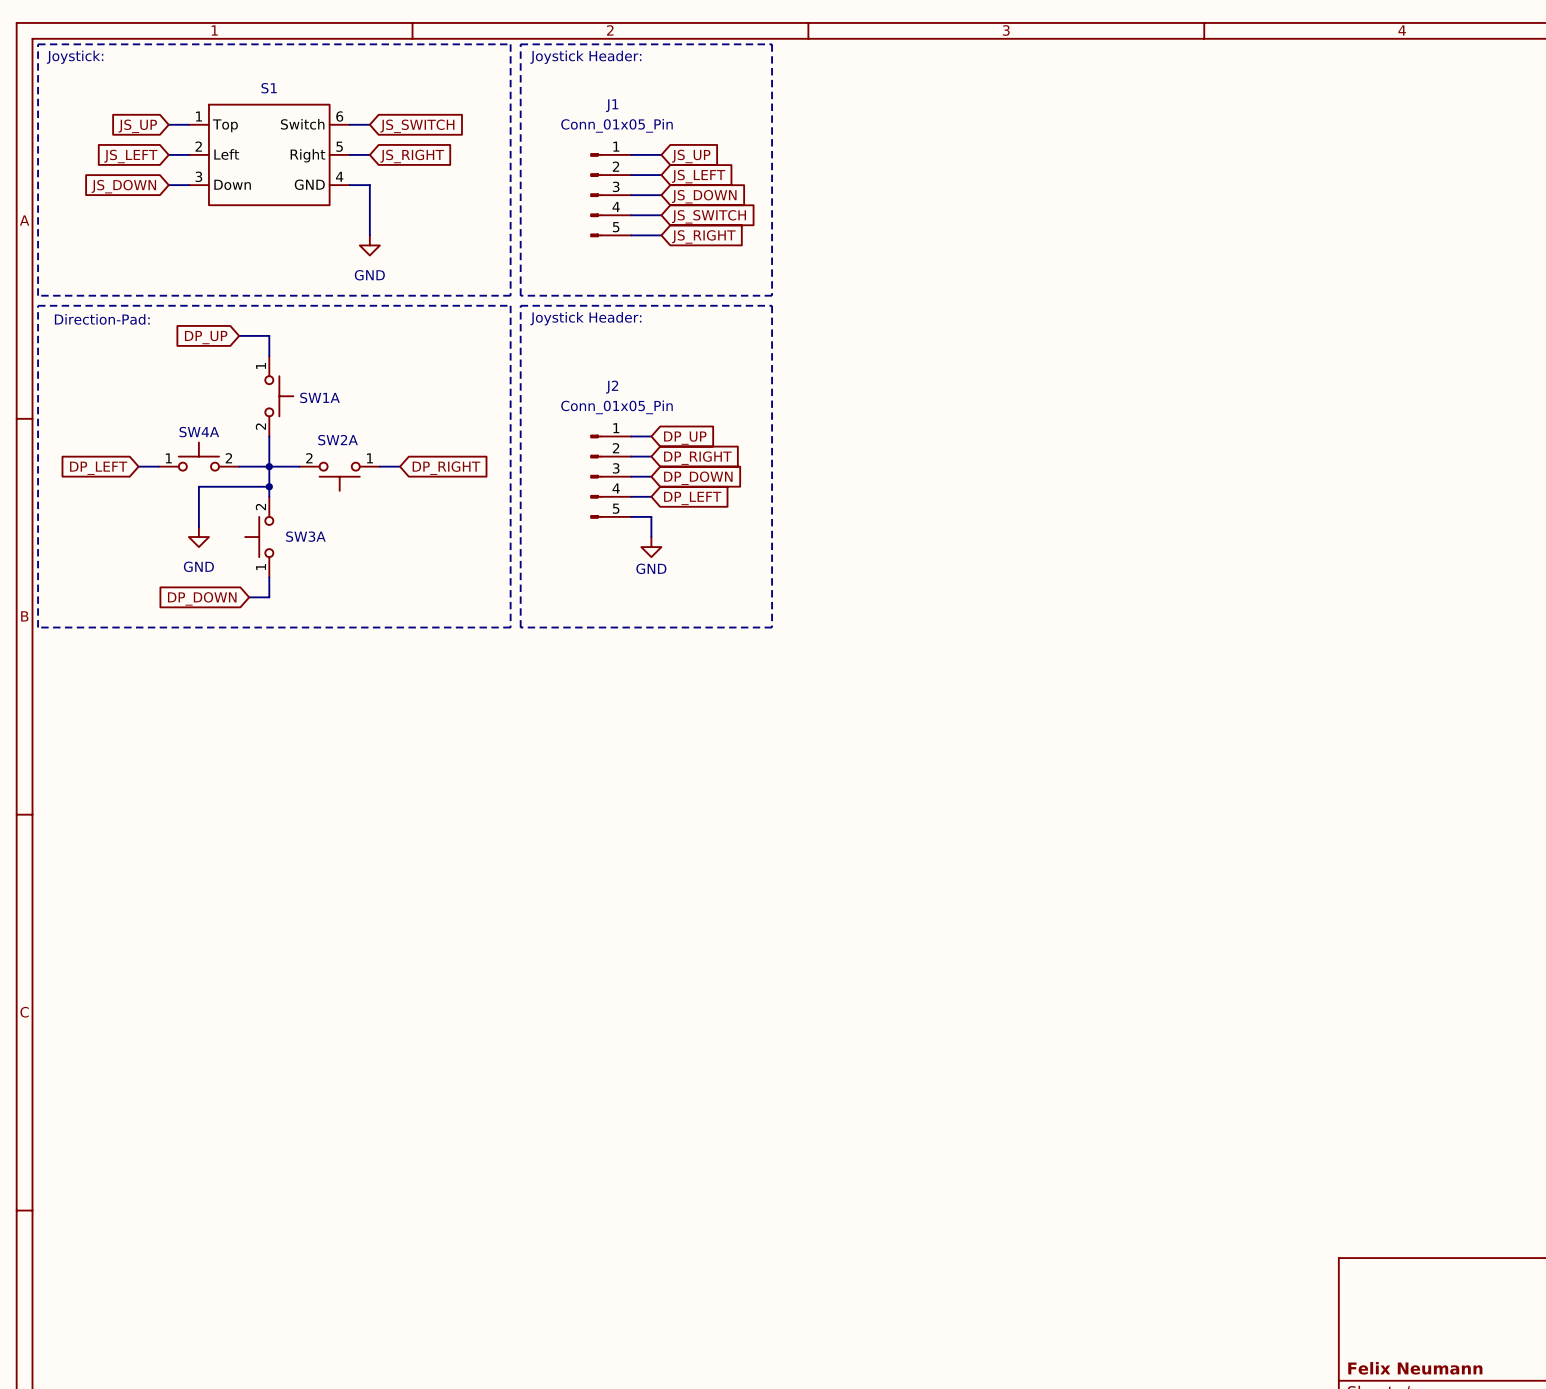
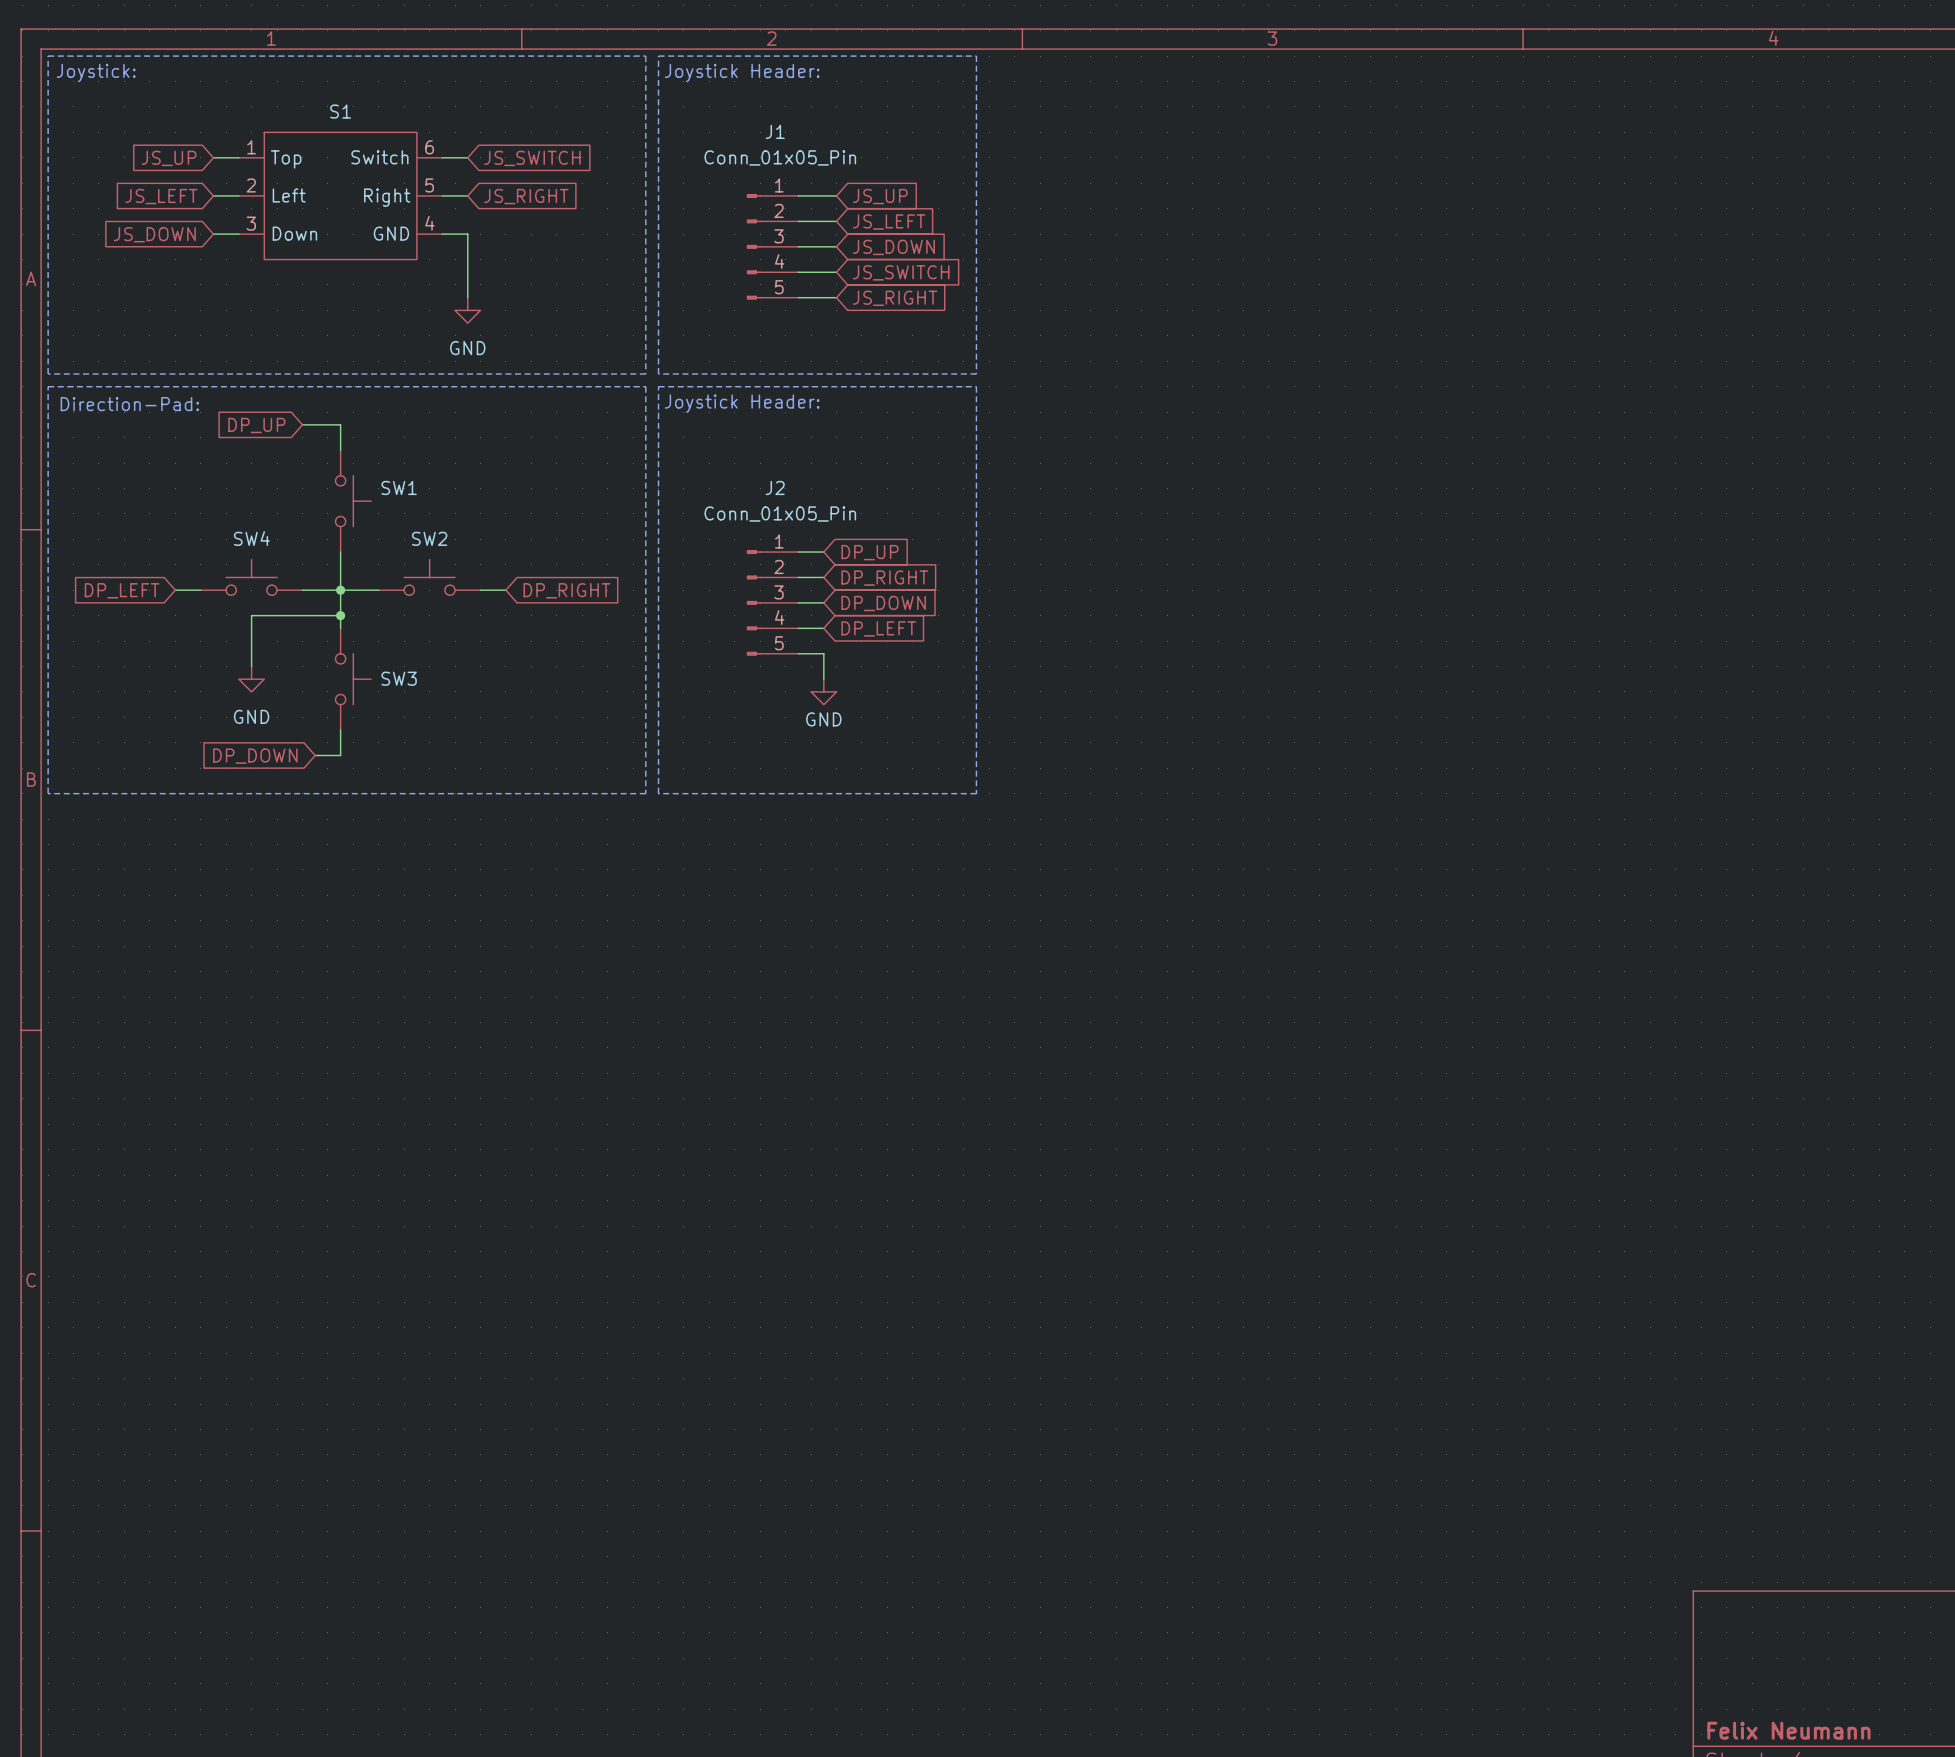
SW1A pin number: 1 (261, 365) -> none
SW1A name: SW1A (319, 397) -> SW1 (399, 487)
SW1A pin number: 2 (260, 426) -> none
SW4A name: SW4A (199, 432) -> SW4 (251, 538)
SW2: none -> (429, 577)
SW4A pin number: 1 (168, 458) -> none
SW4A pin number: 2 (228, 458) -> none
SW2A: (339, 476) -> none
SW3A: (259, 537) -> none
SW3: none -> (353, 679)

